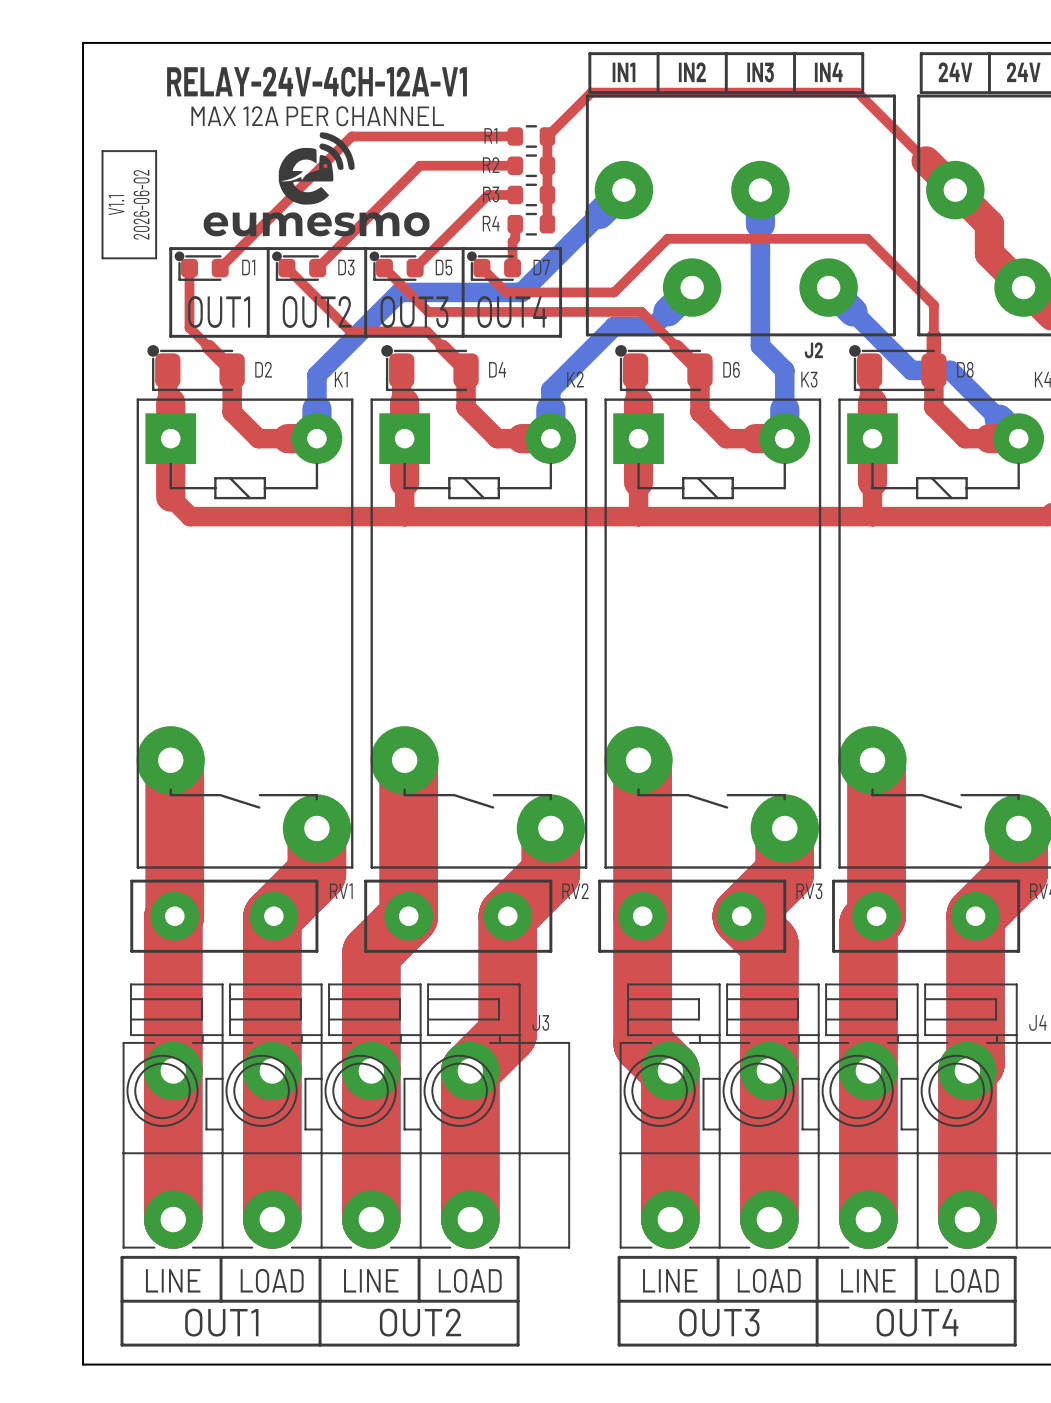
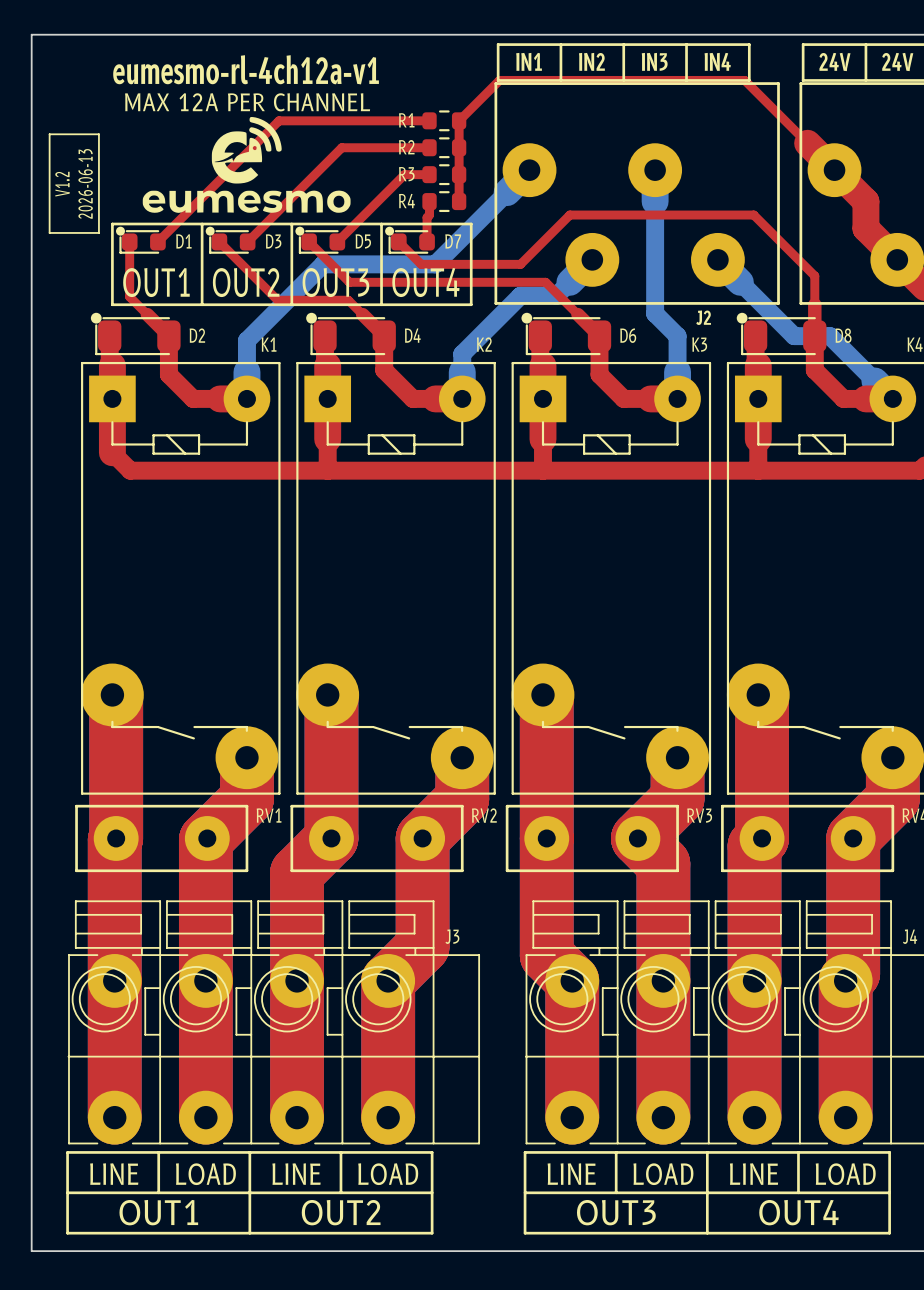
text: RELAY-24V-4CH-12A-V1 (317, 81) -> eumesmo-rl-4ch12a-v1 (246, 69)
text: 2026-06-02 (141, 204) -> 2026-06-13 (85, 183)
text: V1.1 (116, 205) -> V1.2 (62, 184)

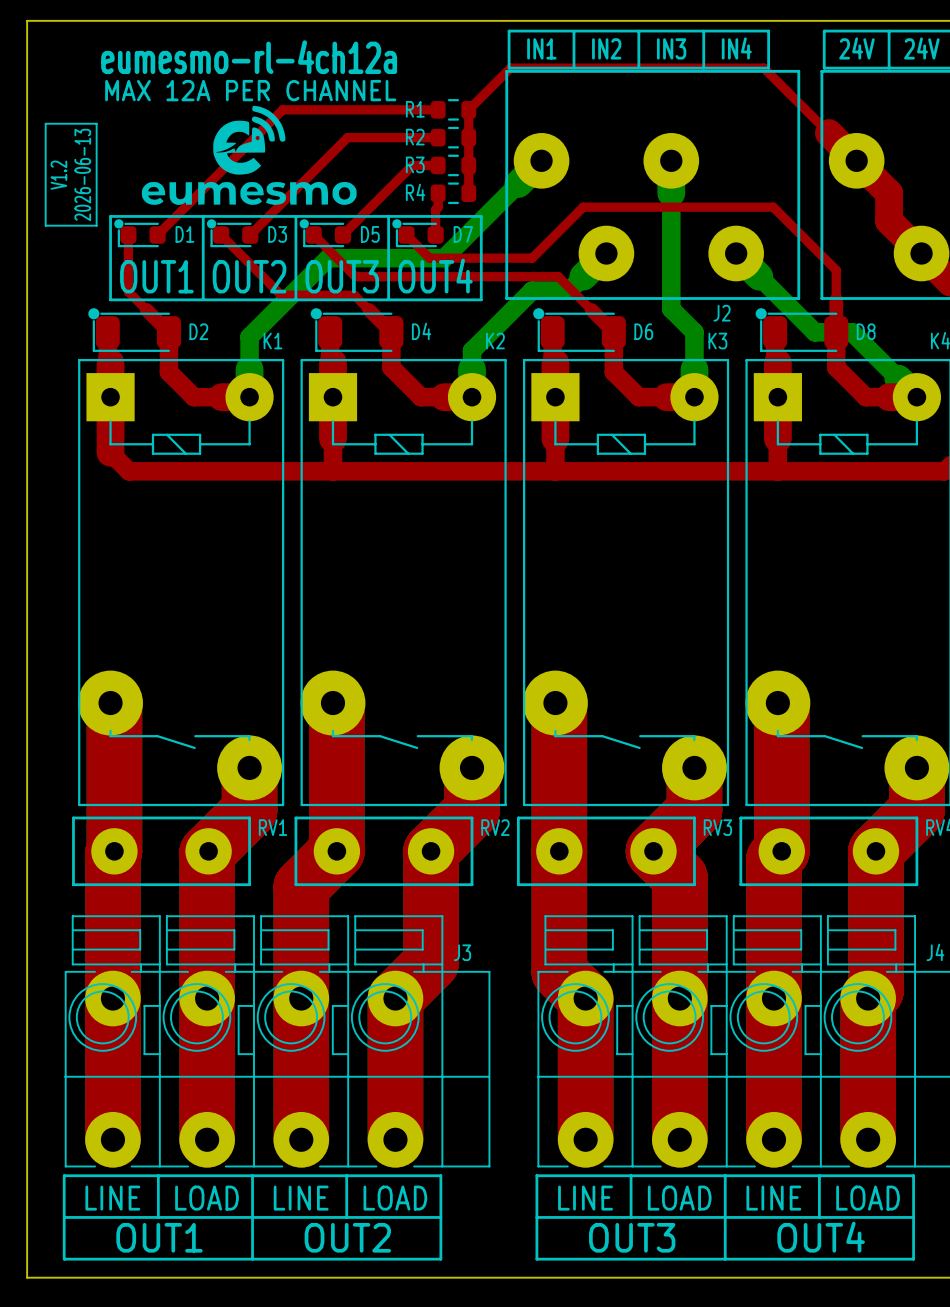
text: eumesmo-rl-4ch12a-v1 (246, 69) -> eumesmo-rl-4ch12a (249, 57)

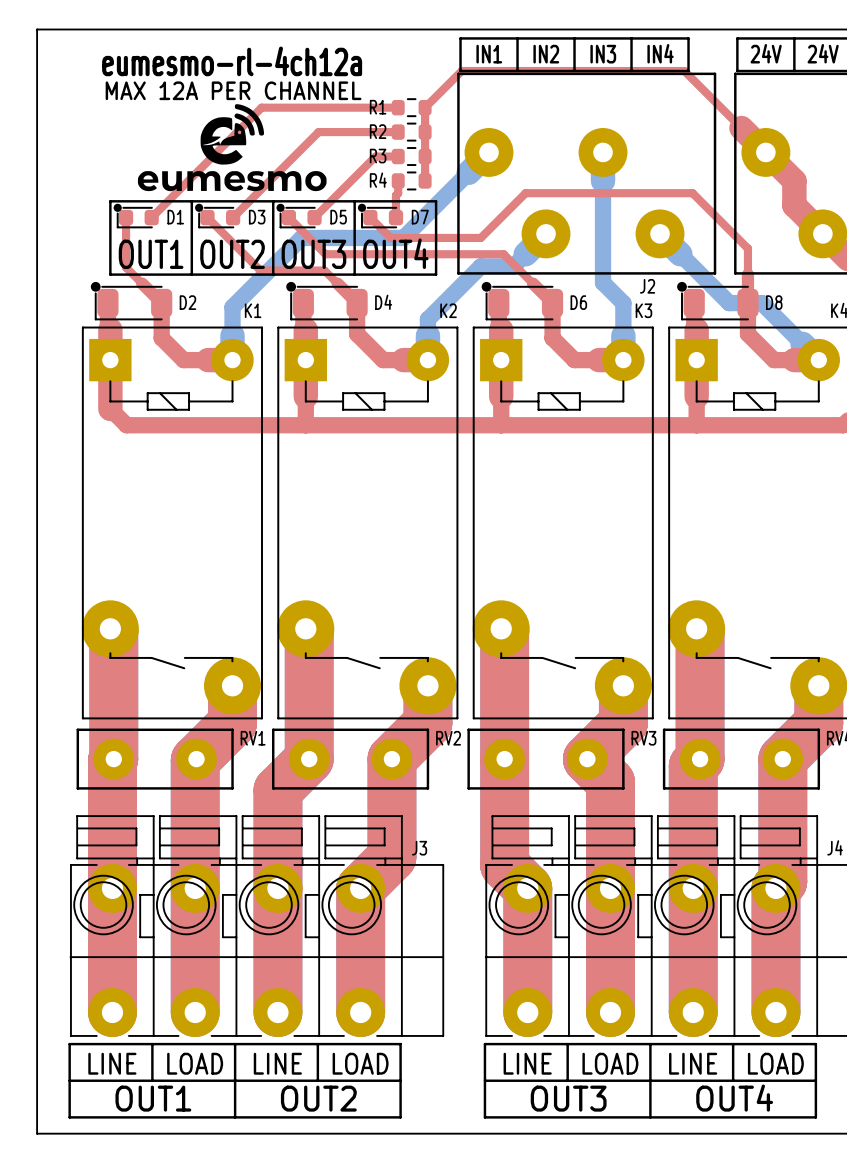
line: (45, 123) (96, 123) (96, 225) (45, 225) (45, 123) -> none
text: 2026-06-13 (82, 174) -> none
text: V1.2 (58, 175) -> none

